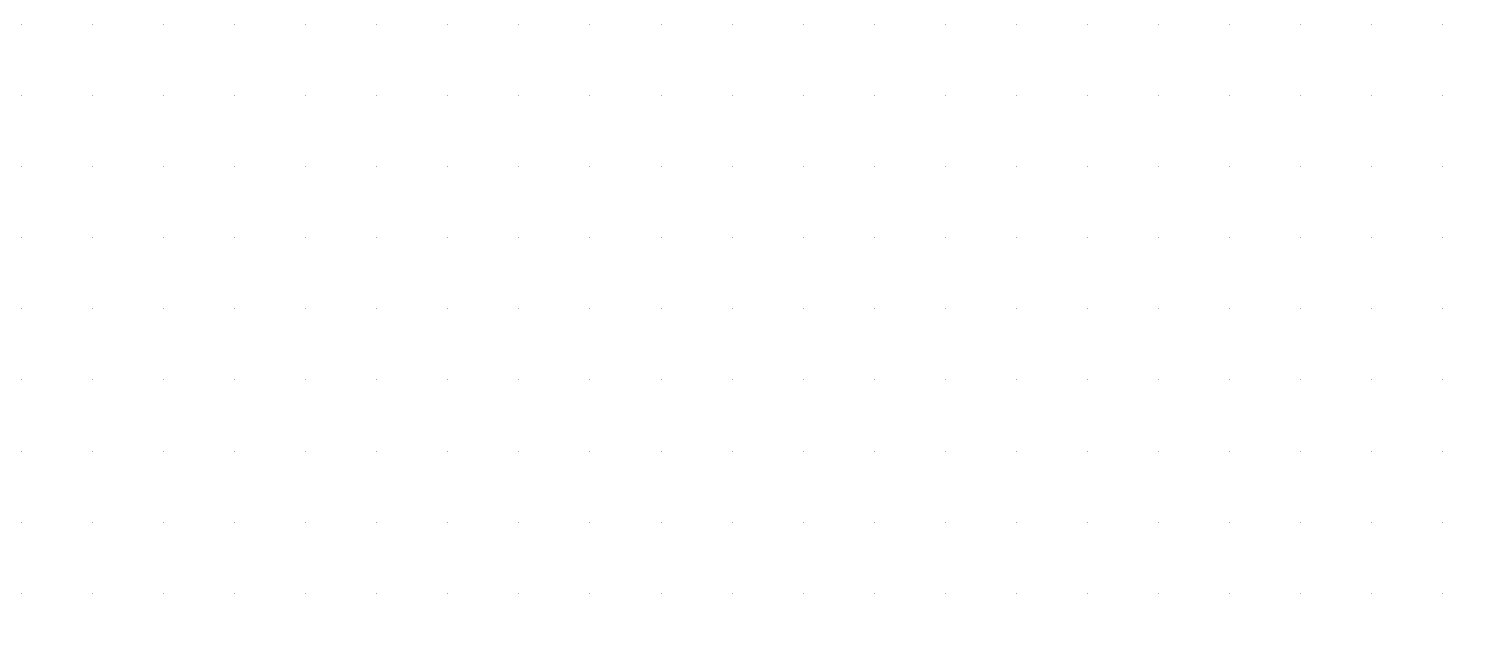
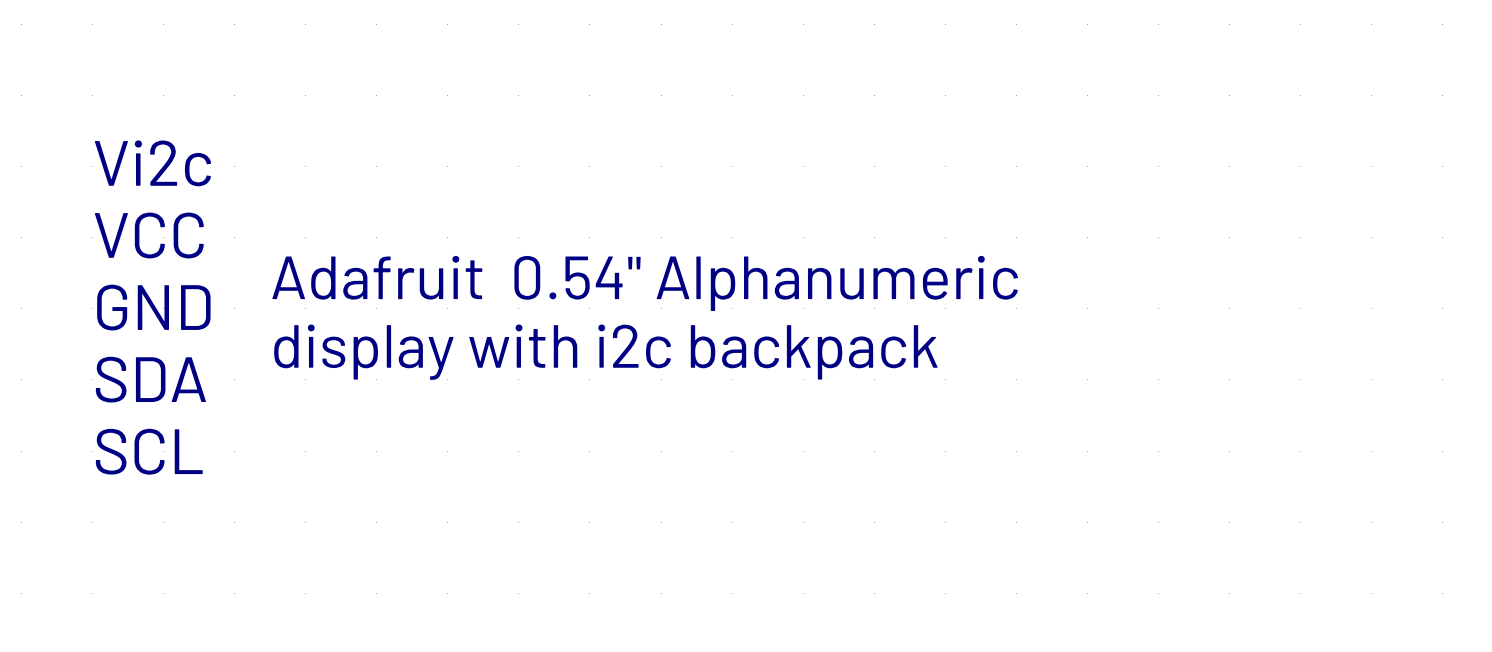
text: none -> Vi2c (152, 163)
text: none -> VCC (149, 235)
text: none -> Adafruit 0.54" Alphanumeric (645, 283)
text: none -> GND (153, 307)
text: none -> display with i2c backpack (605, 352)
text: none -> SDA (150, 379)
text: none -> SCL (149, 451)

